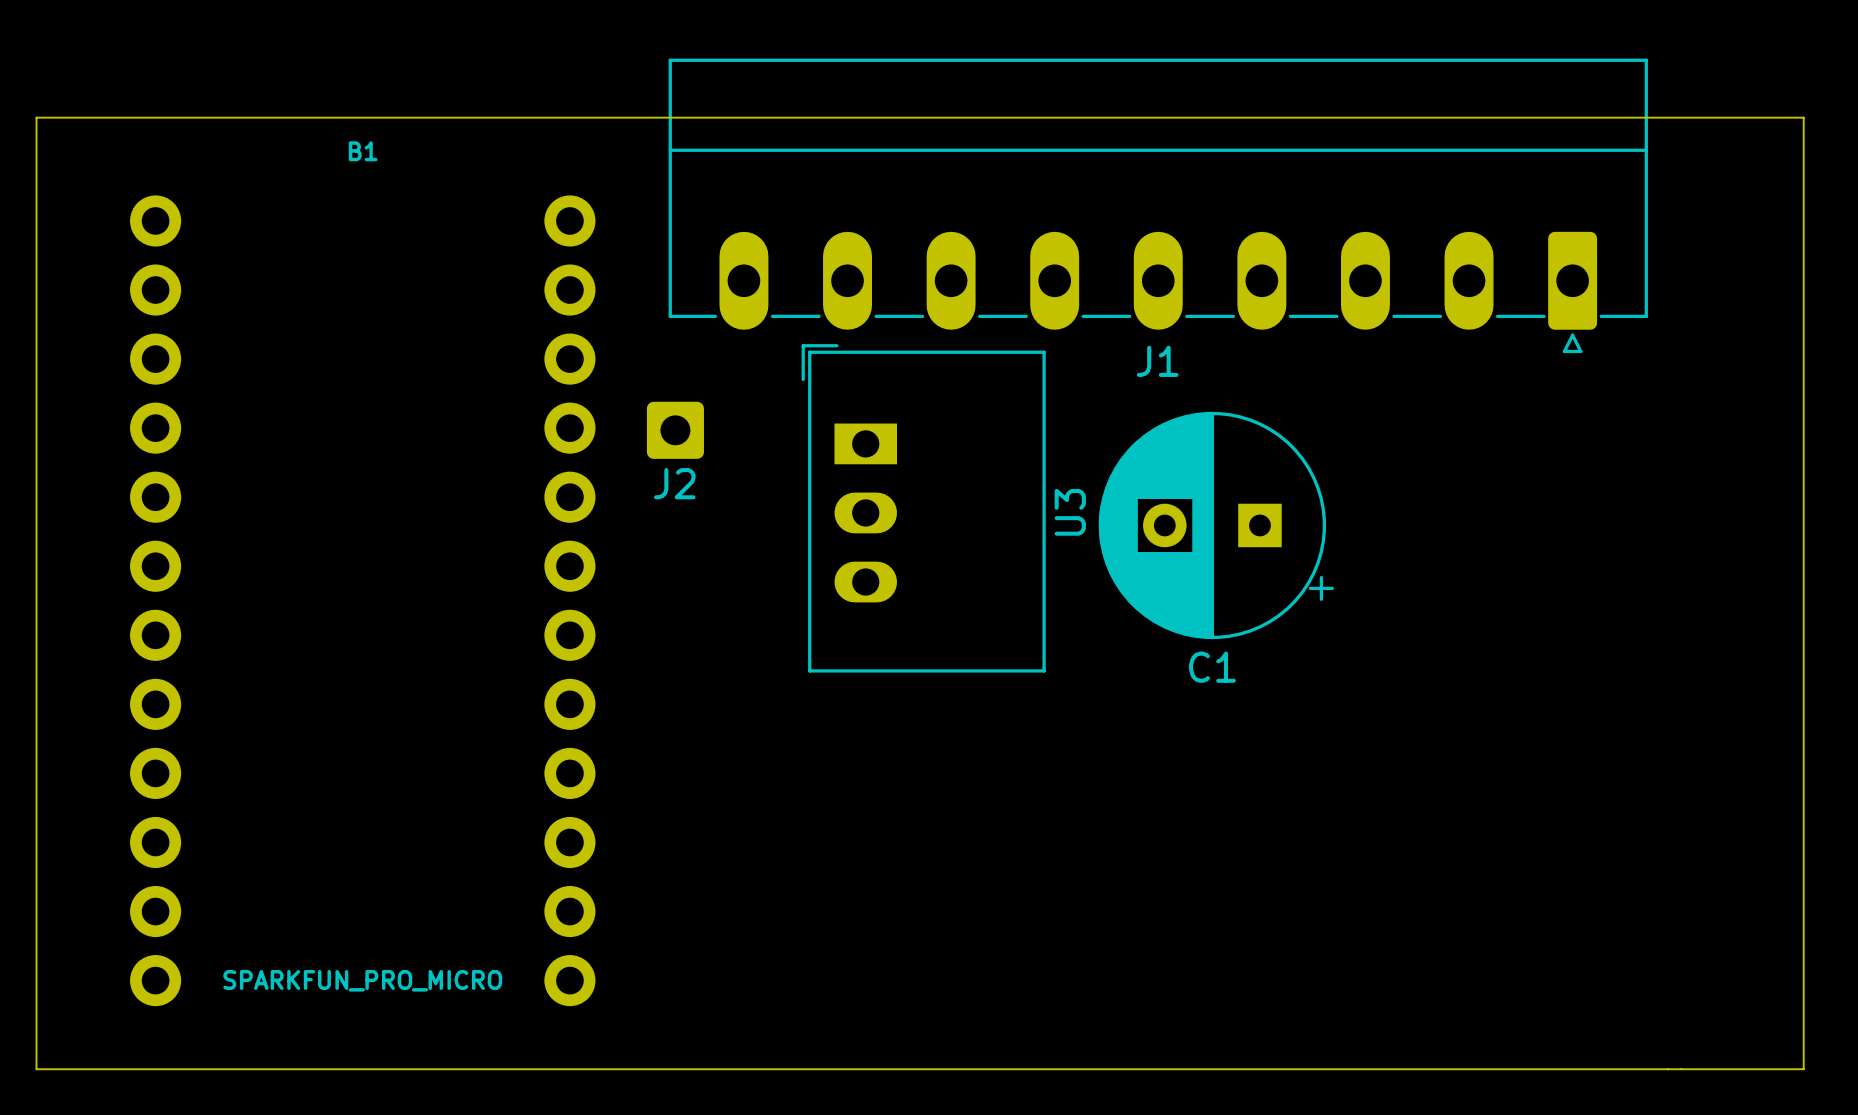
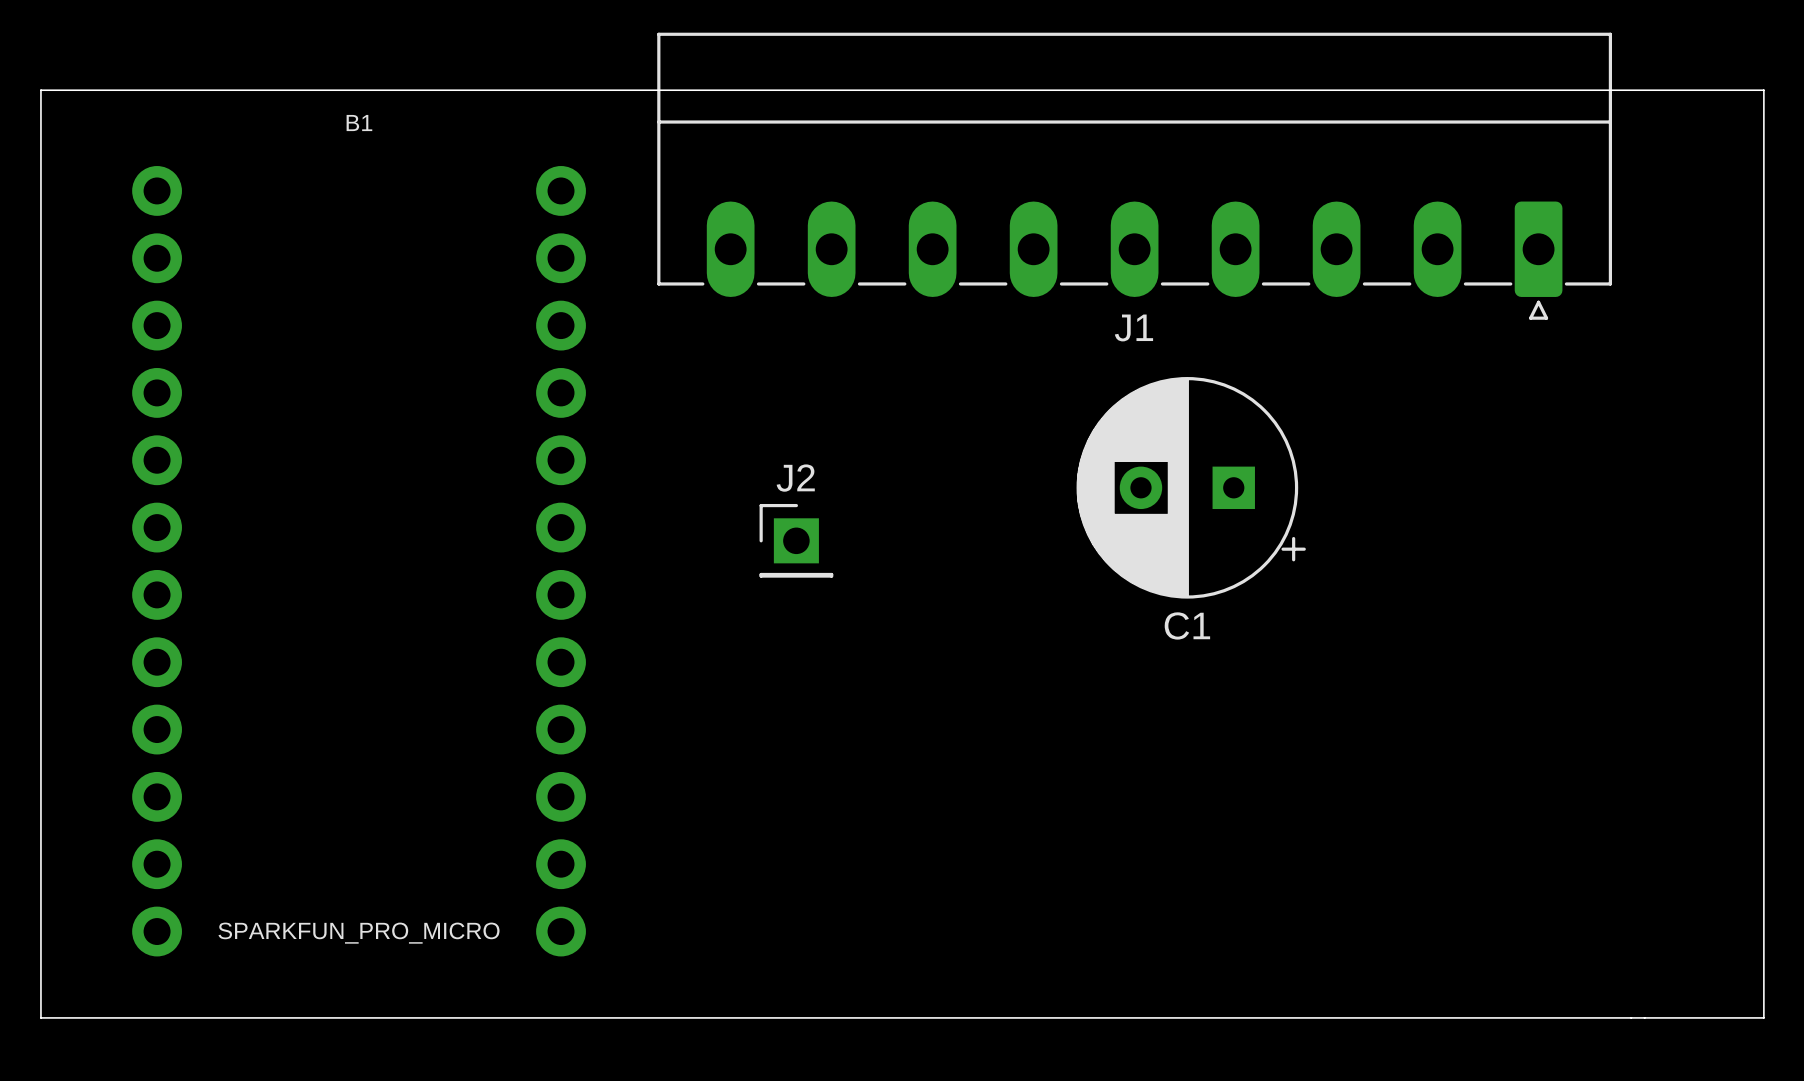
J2 footprint: [646, 401, 704, 459] -> [759, 503, 834, 578]
J2 name position: J2 (674, 483) -> J2 (795, 478)
U3: (923, 508) -> none

